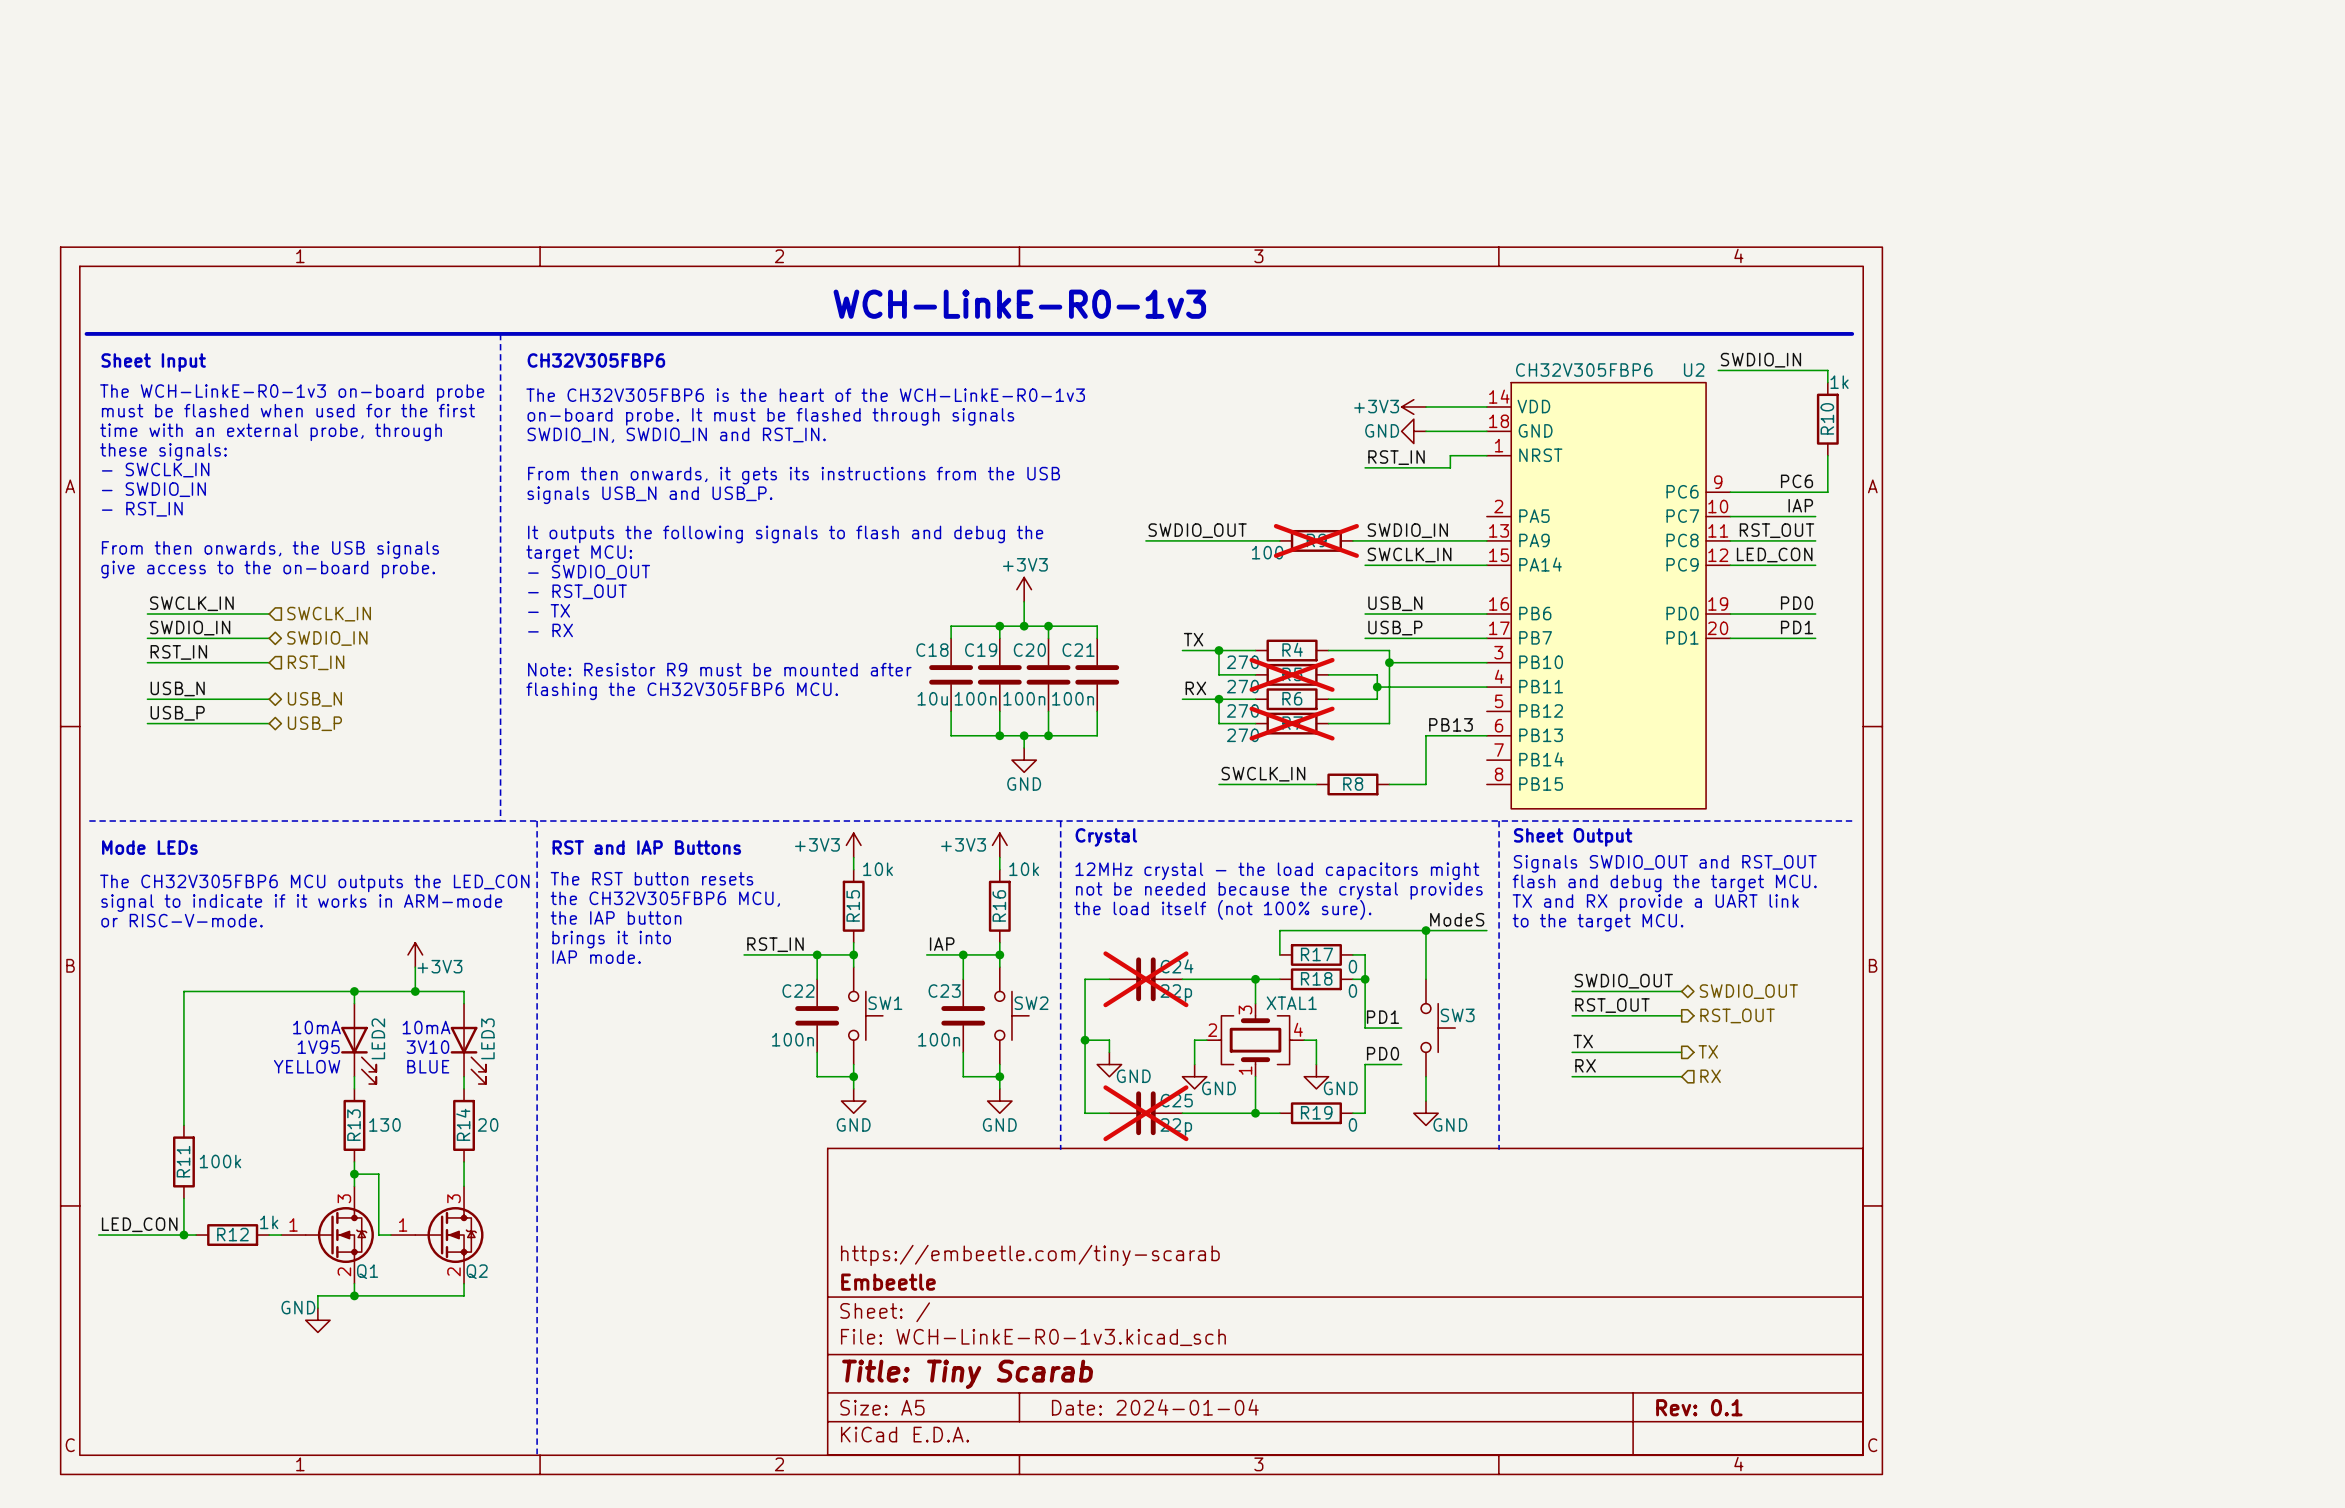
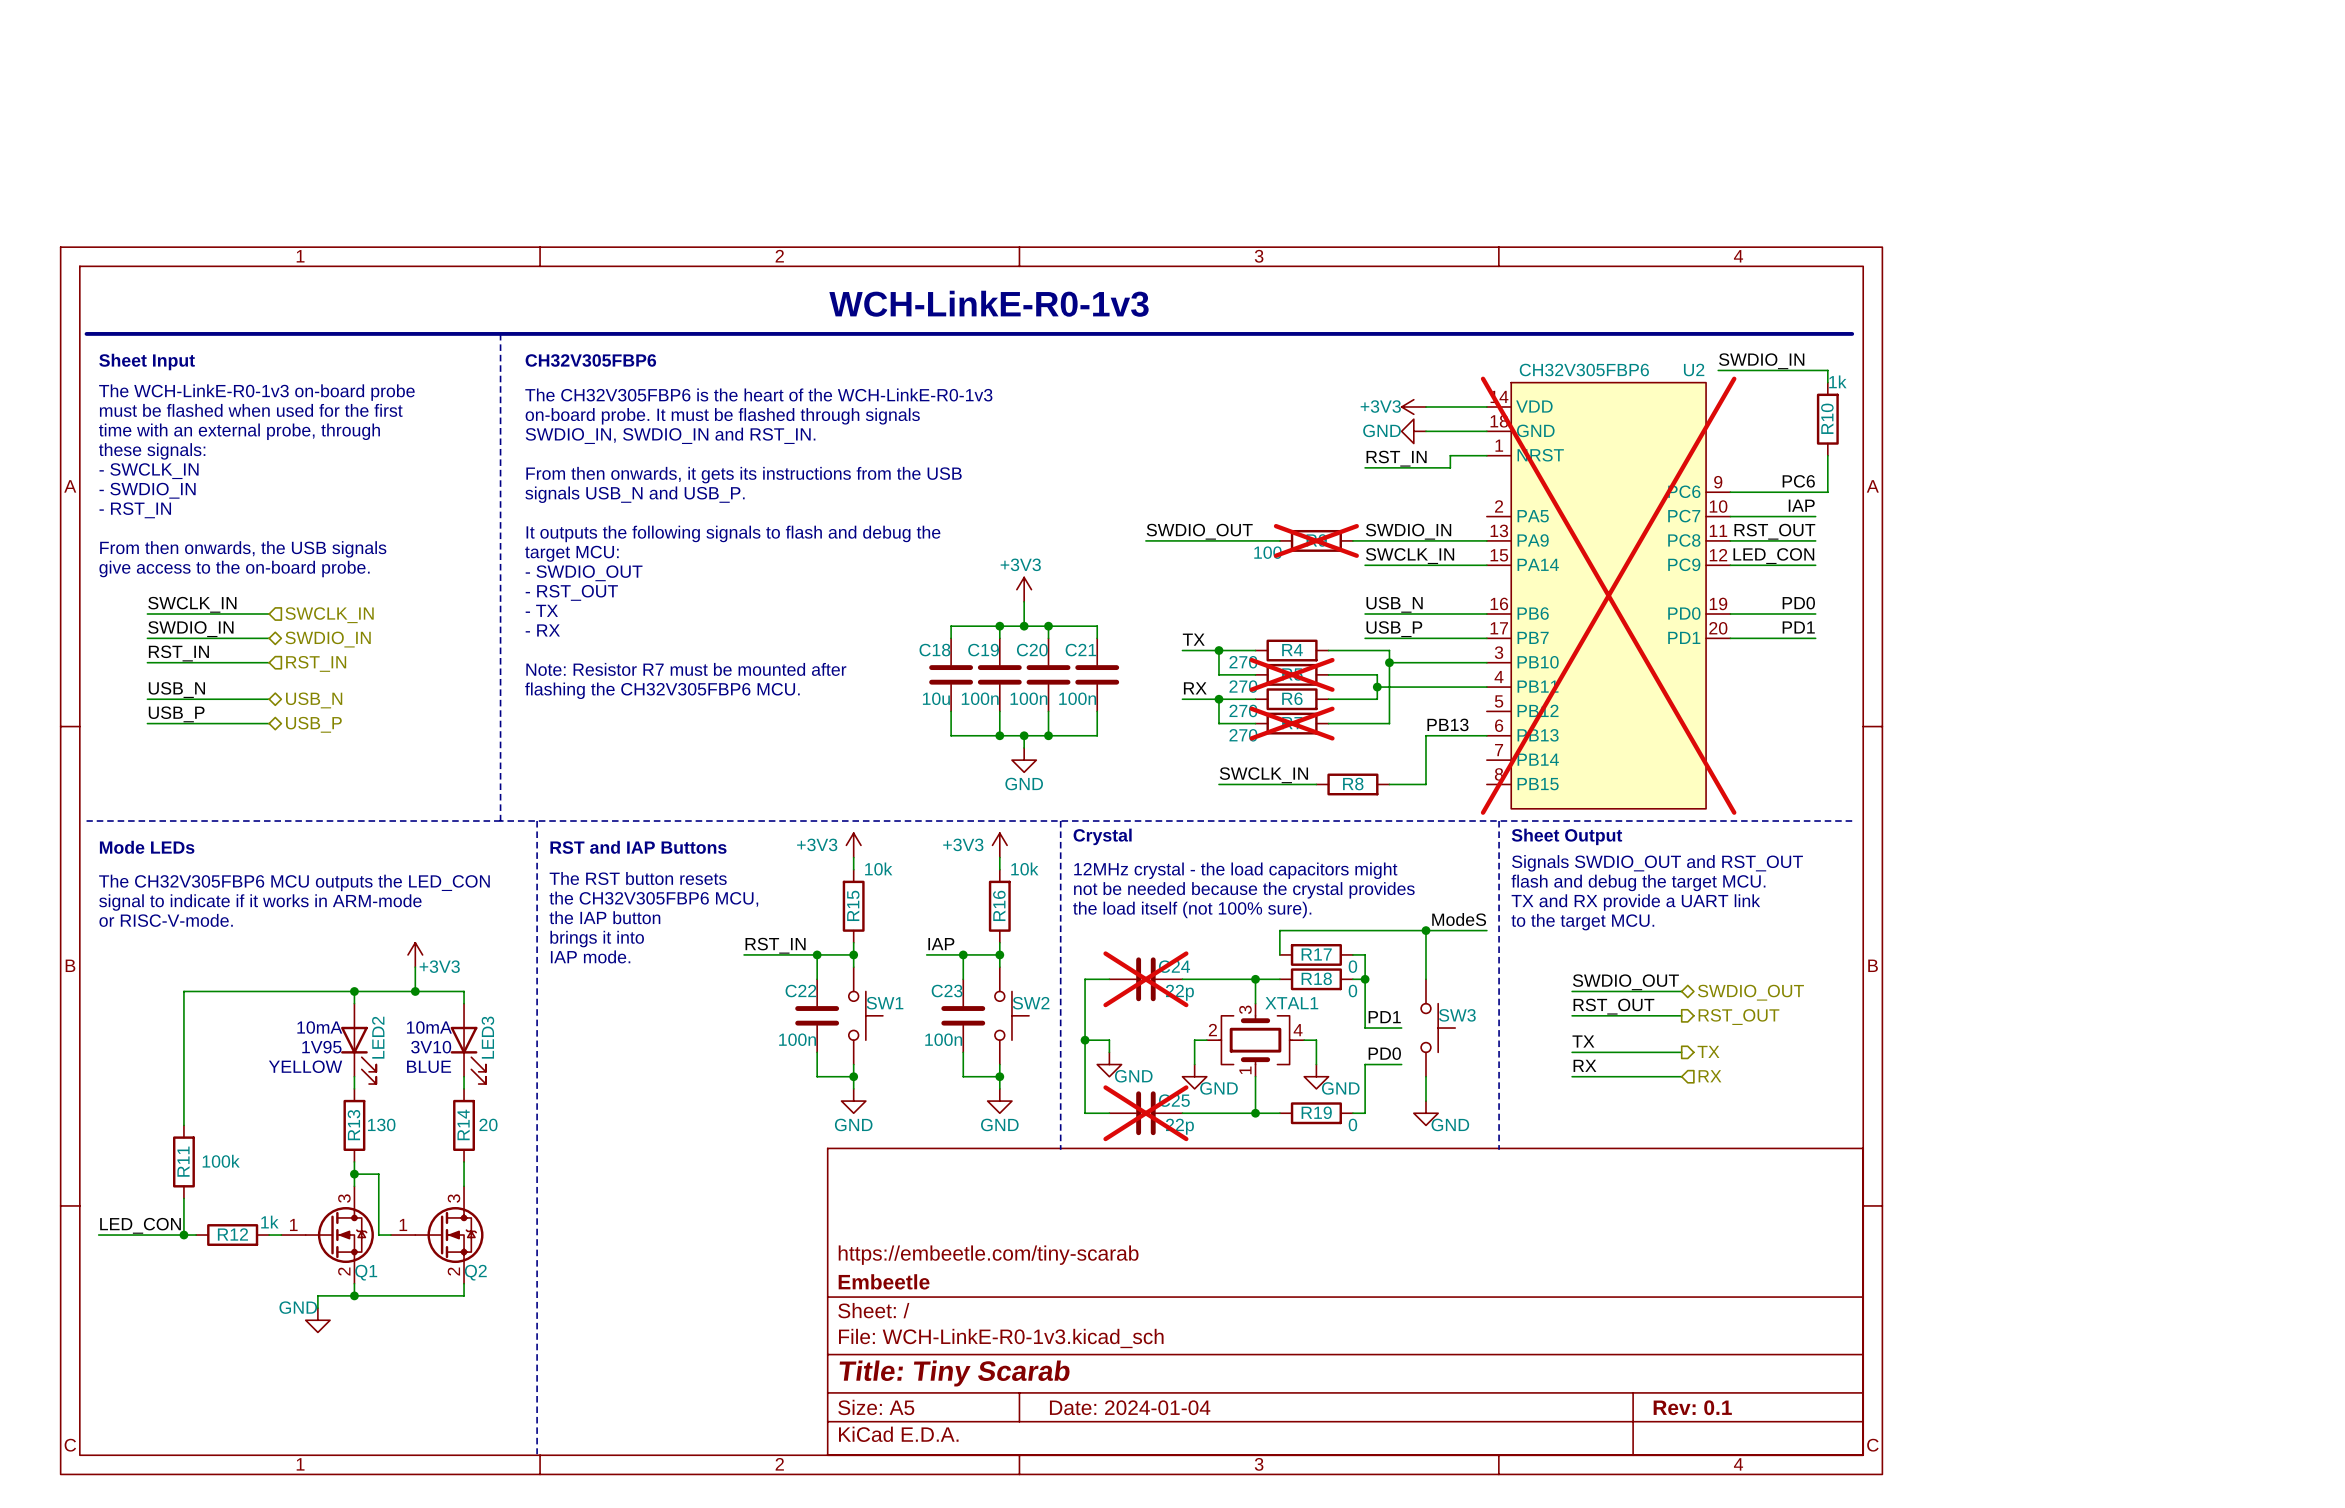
U2 do-not-place cross: none -> (1608, 595)
text: Note: Resistor R9 must be mounted after (719, 669) -> Note: Resistor R7 must be mounted after (686, 669)

